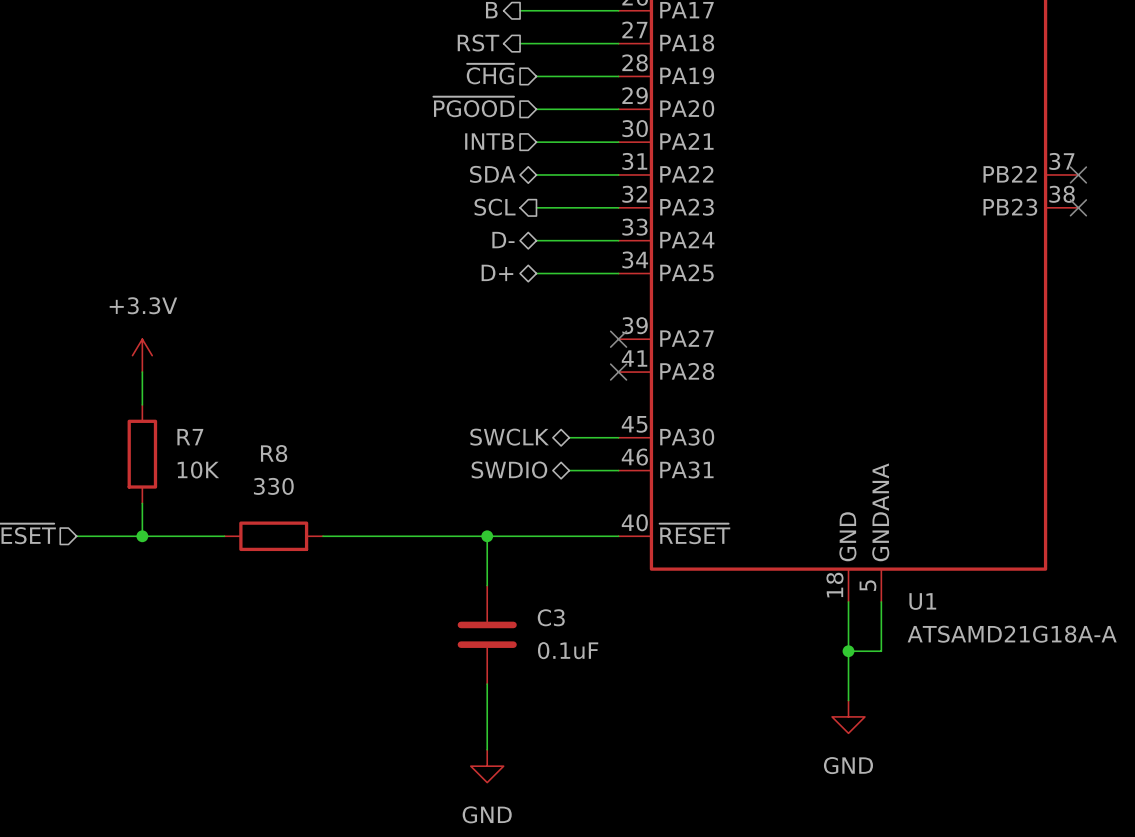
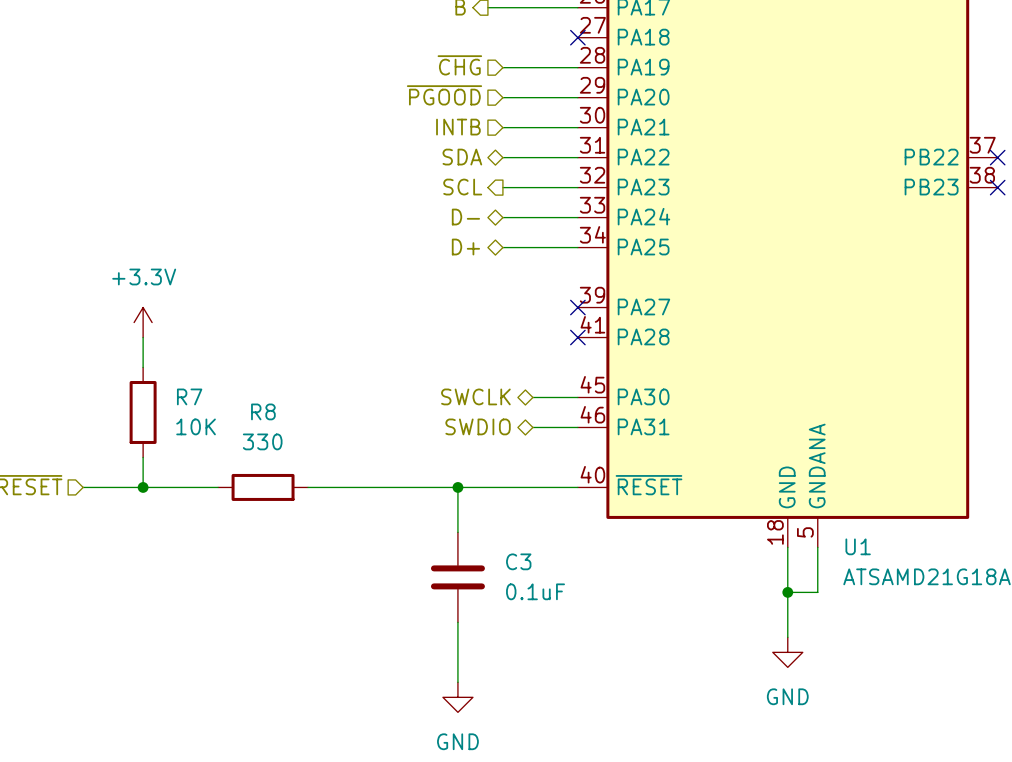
hierarchical label: RST (478, 43) -> none
wire: (520, 43) (618, 43) -> none
no-connect mark: none -> (577, 37)

